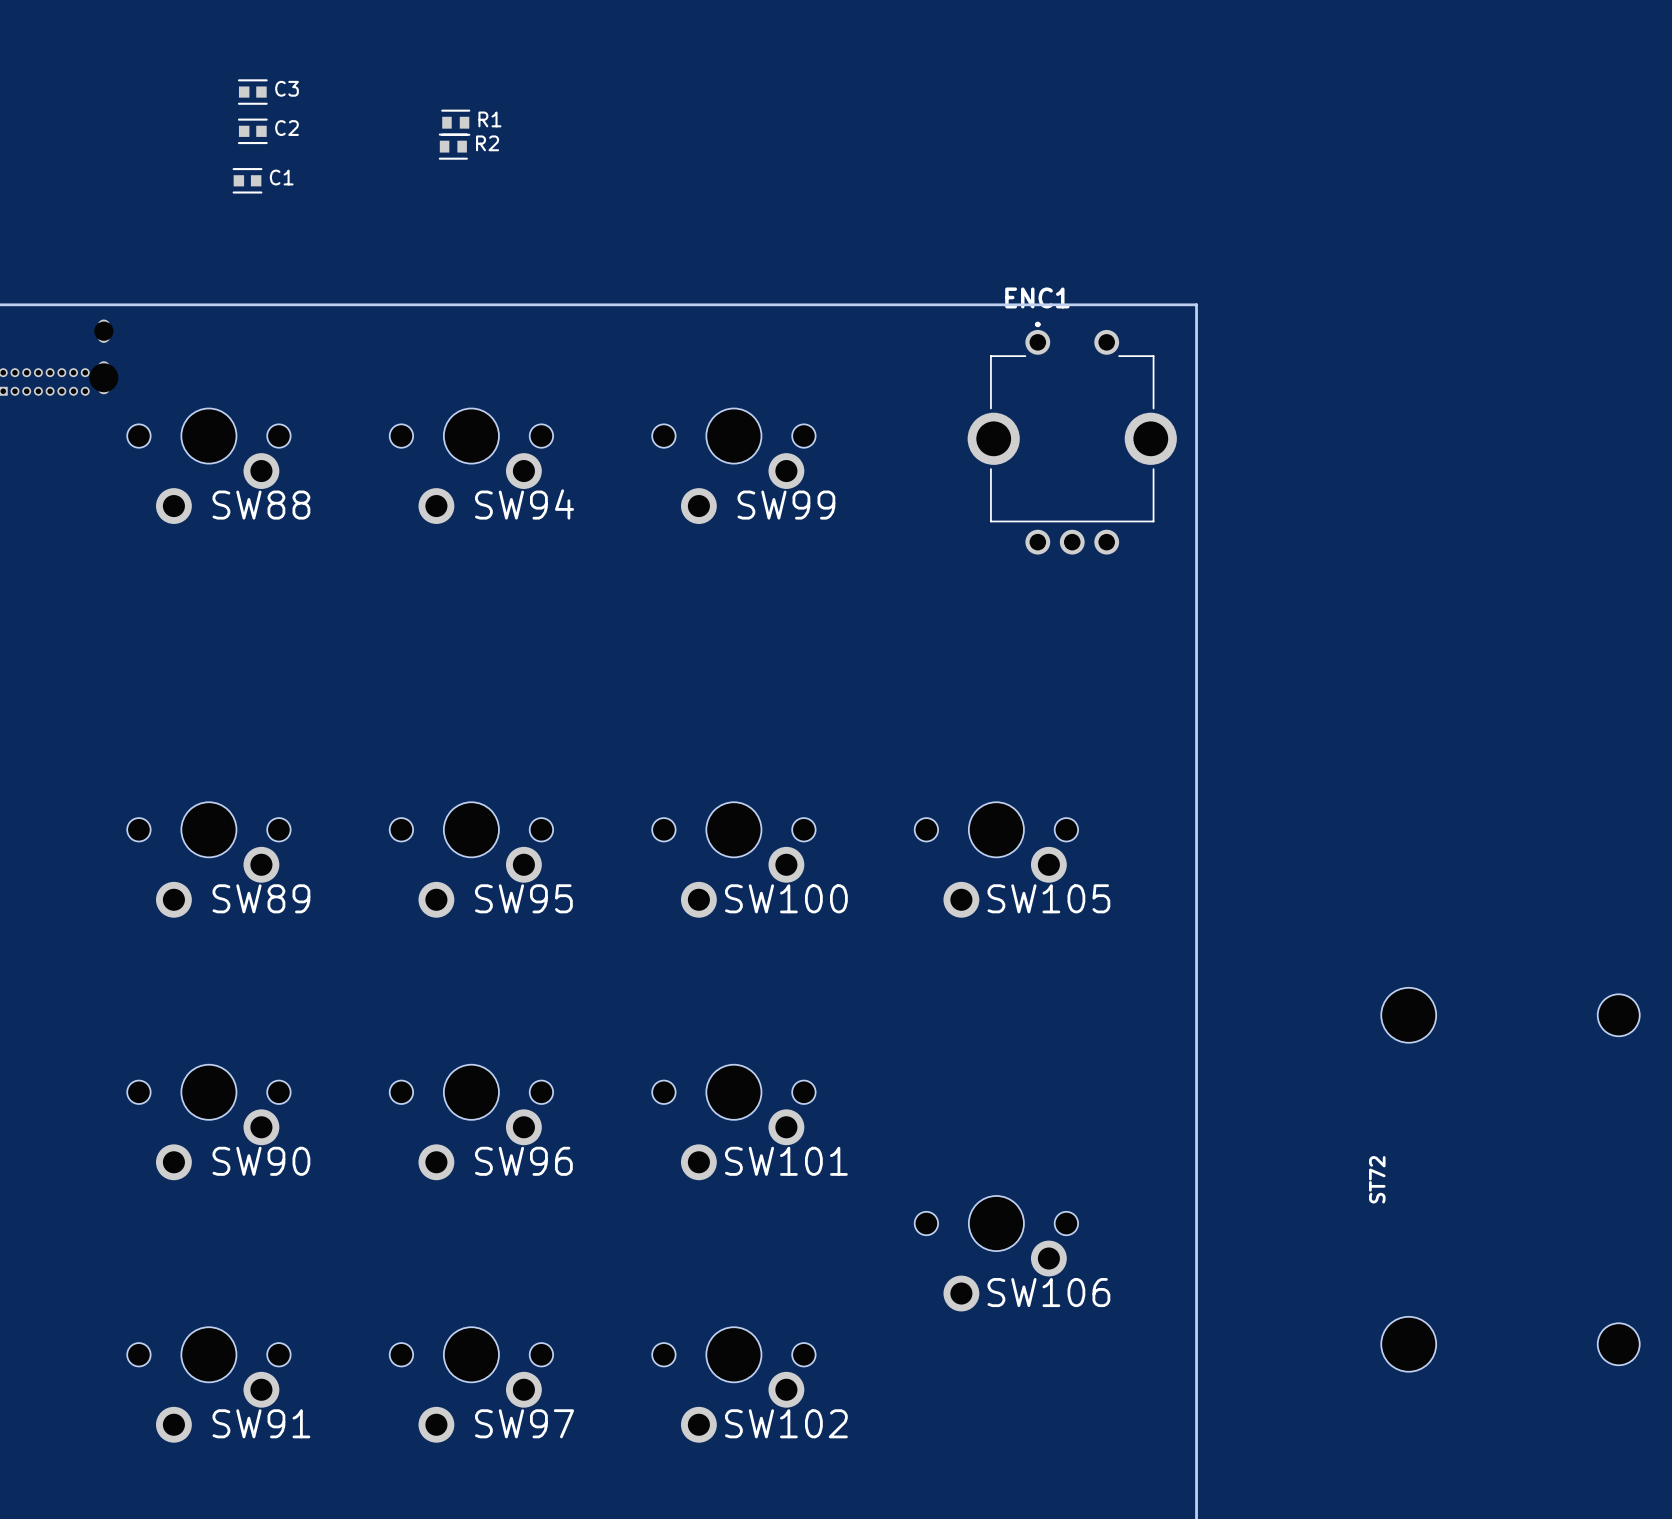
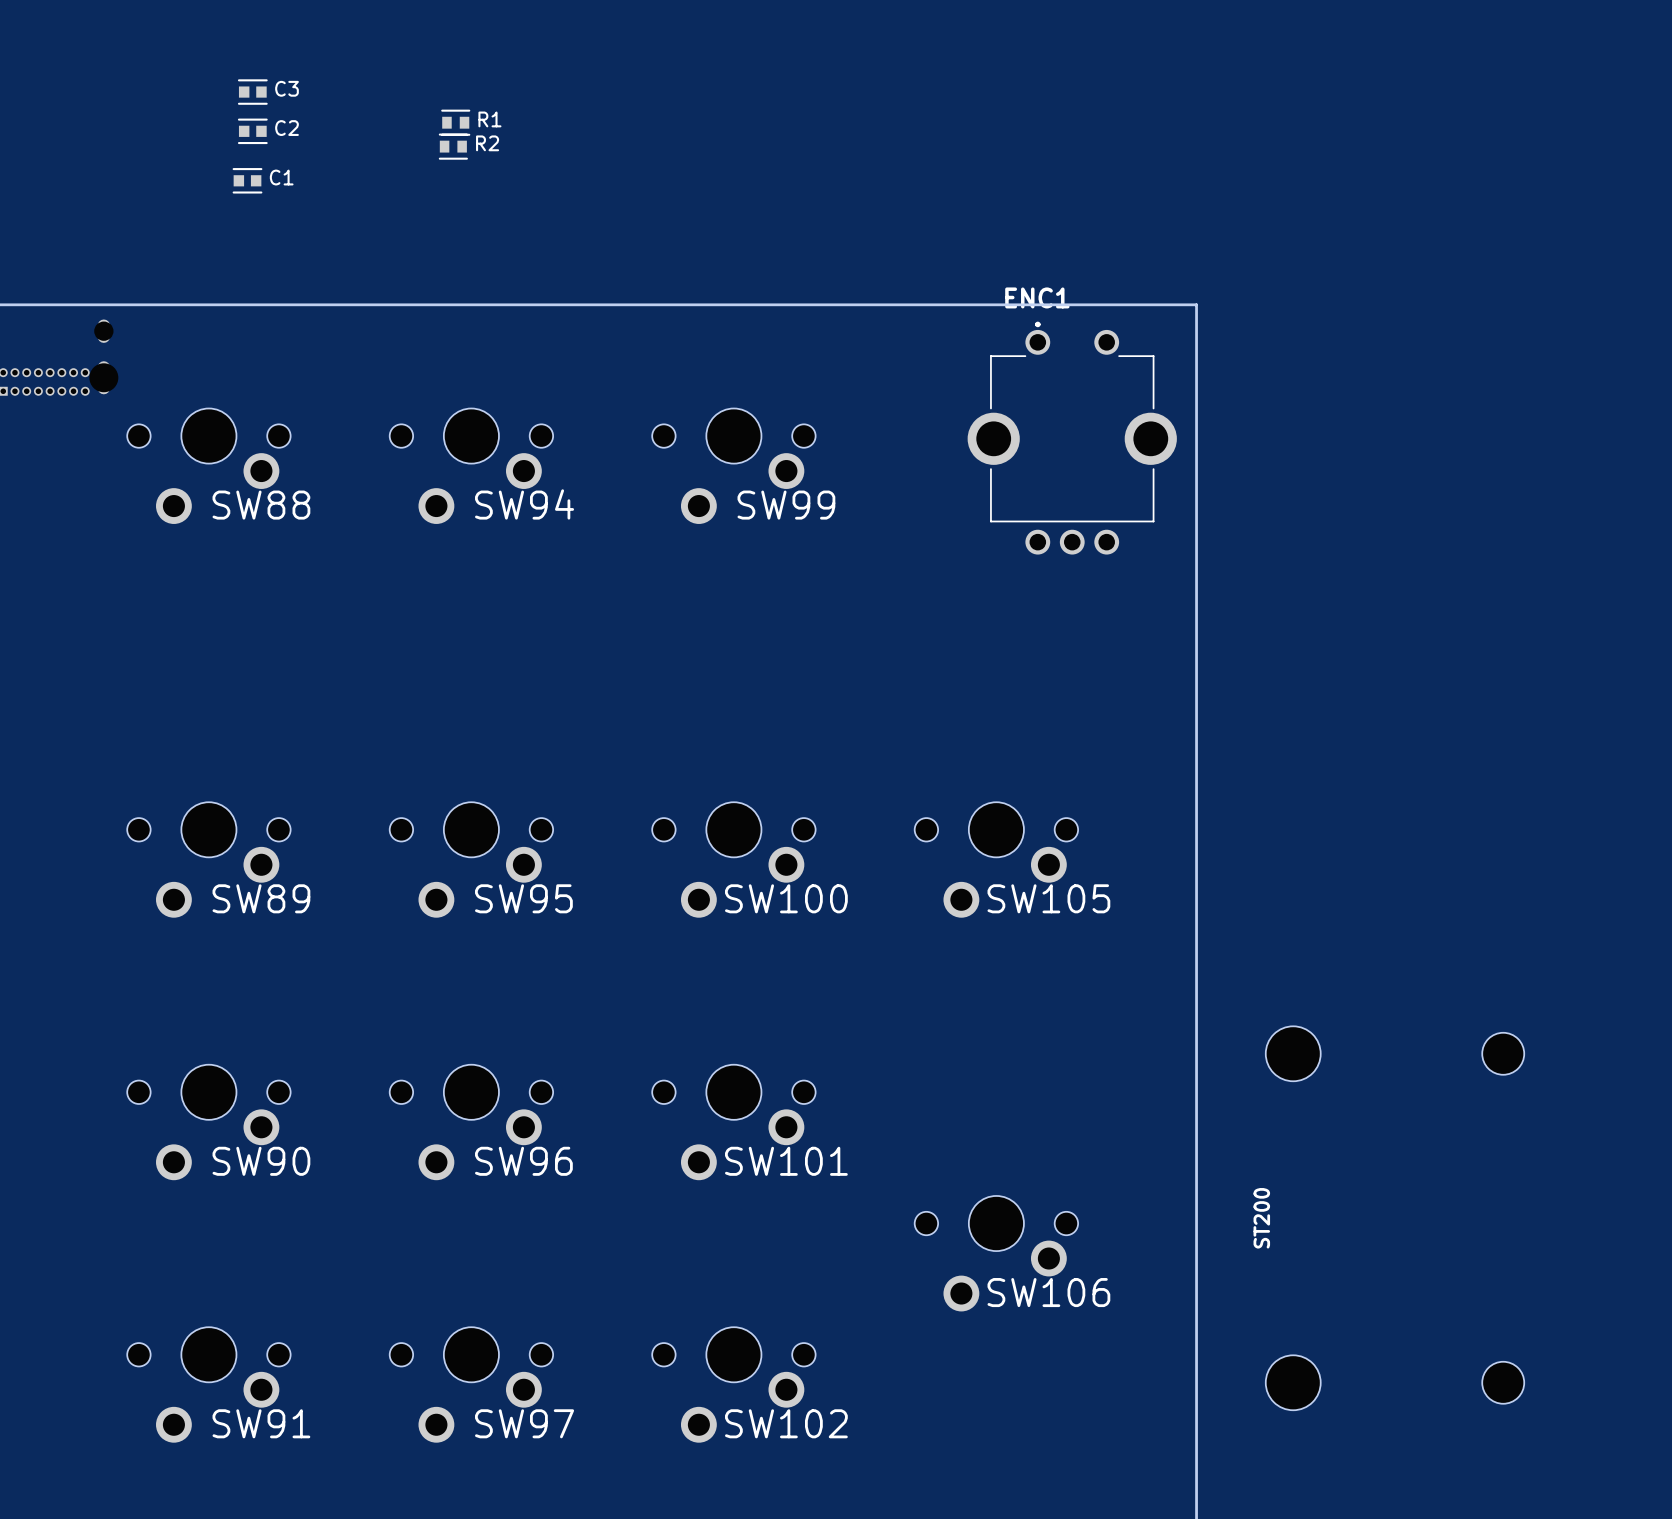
ST72: (1510, 1179) -> none
ST200: none -> (1394, 1218)

